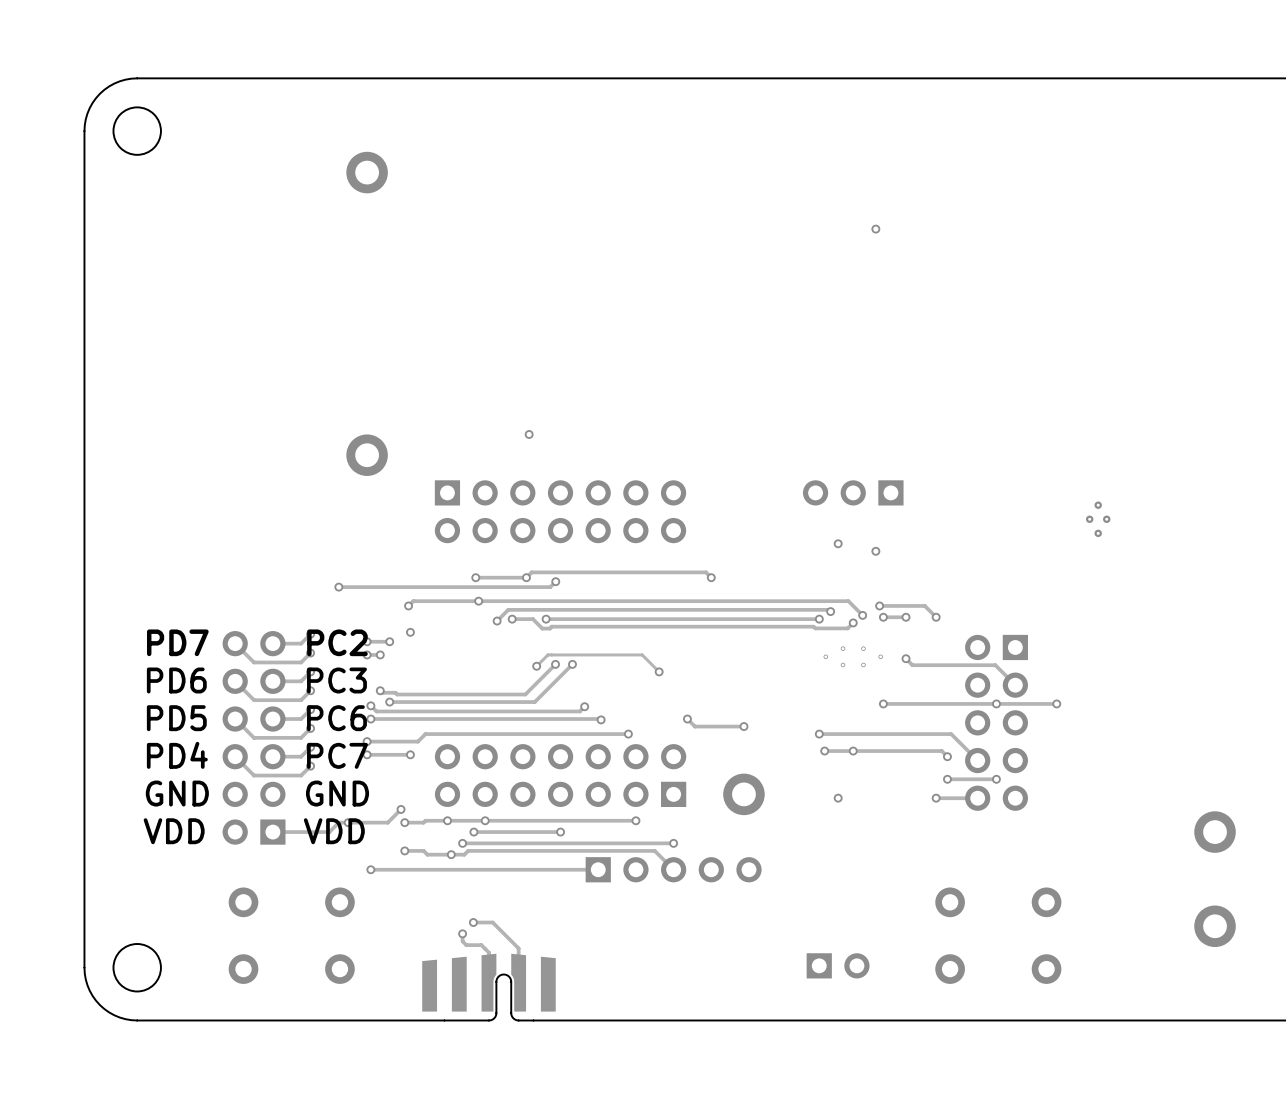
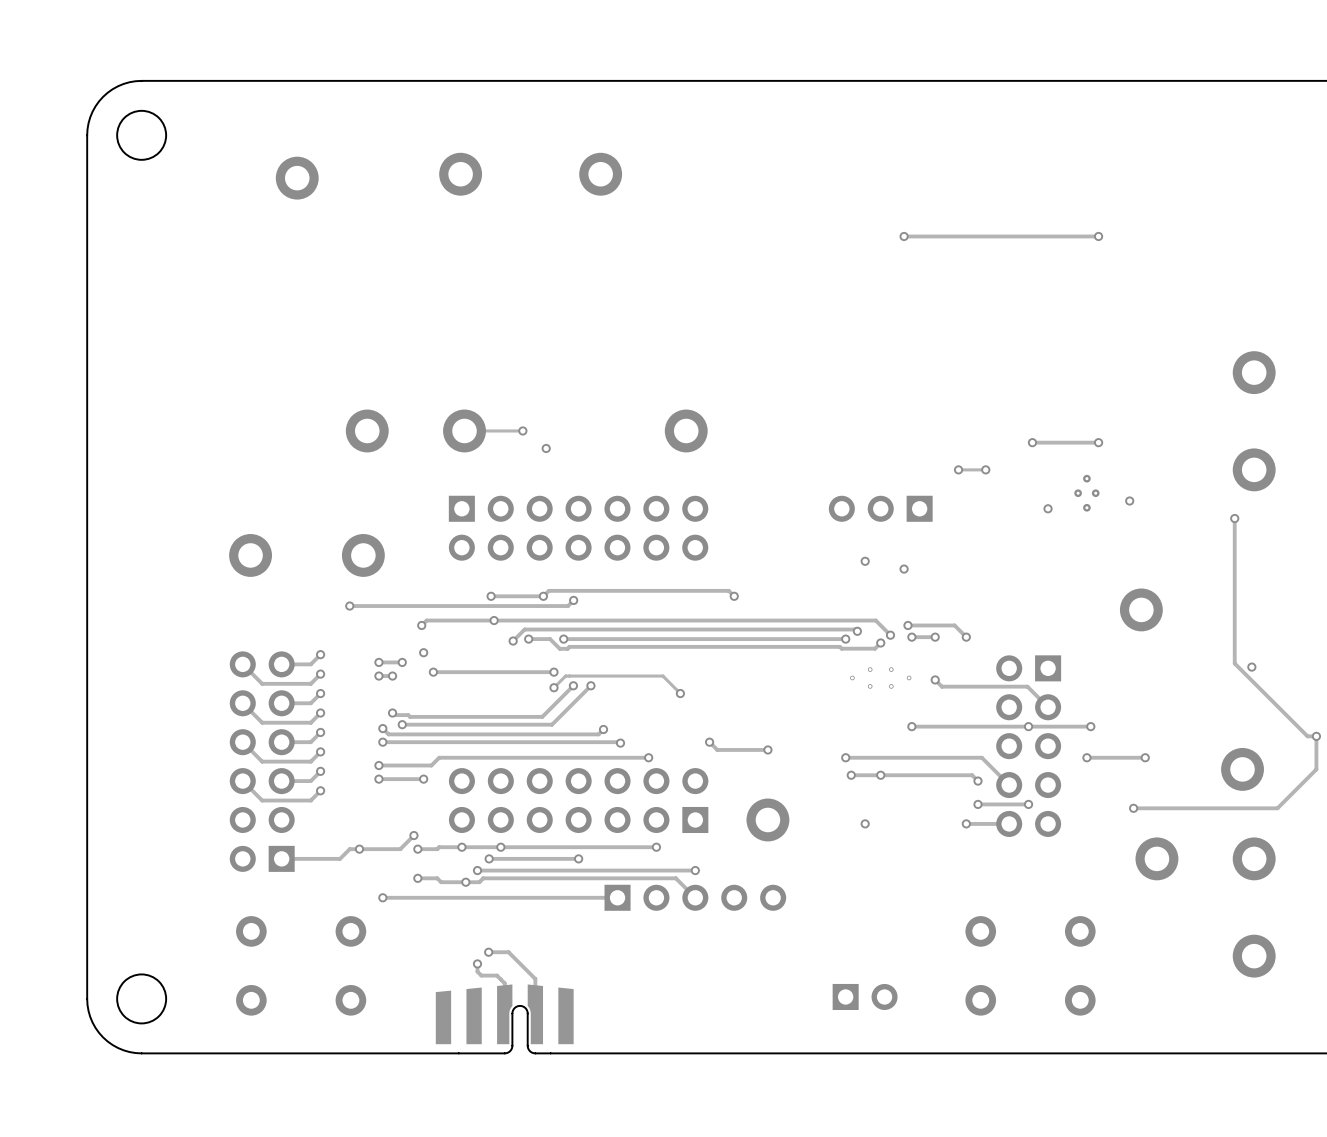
part: none -> (460, 174)
part: none -> (600, 174)
part: none -> (297, 178)
part: (367, 172) -> none
track: none -> (1098, 236) (904, 236)
via: none -> (1098, 236)
part: none -> (1254, 372)
part: none -> (464, 430)
track: none -> (522, 430) (464, 430)
via: none -> (522, 430)
part: none -> (686, 430)
via: none -> (1032, 442)
track: none -> (1098, 442) (1032, 442)
via: none -> (1098, 442)
part position: (367, 455) -> (367, 430)
via: none -> (958, 469)
track: none -> (985, 469) (958, 469)
via: none -> (985, 469)
part: none -> (1254, 469)
via: none -> (1129, 501)
via: none -> (1048, 508)
track: none -> (1234, 518) (1234, 663) (1307, 736) (1316, 736) (1316, 769) (1277, 808) (1133, 808)
via: none -> (1234, 518)
part position: (1098, 519) -> (1086, 493)
part: none -> (250, 555)
part: none -> (363, 555)
part: none -> (1141, 609)
text: PD7 (177, 642) -> none
text: PC2 (337, 642) -> none
via: none -> (1251, 667)
via: none -> (433, 672)
track: none -> (553, 672) (433, 672)
via: none -> (553, 672)
text: PD6 (176, 680) -> none
text: PC3 (336, 680) -> none
via: none -> (1316, 736)
text: PD5 (176, 718) -> none
text: PC6 (336, 718) -> none
via: none -> (1086, 757)
track: none -> (1145, 757) (1086, 757)
via: none -> (1145, 757)
part: none -> (1242, 769)
text: PD4 (177, 755) -> none
text: PC7 (337, 755) -> none
via: none -> (1133, 808)
text: GND (177, 793) -> none
text: GND (337, 793) -> none
text: VDD (174, 831) -> none
text: VDD (334, 831) -> none
part: none -> (1156, 858)

